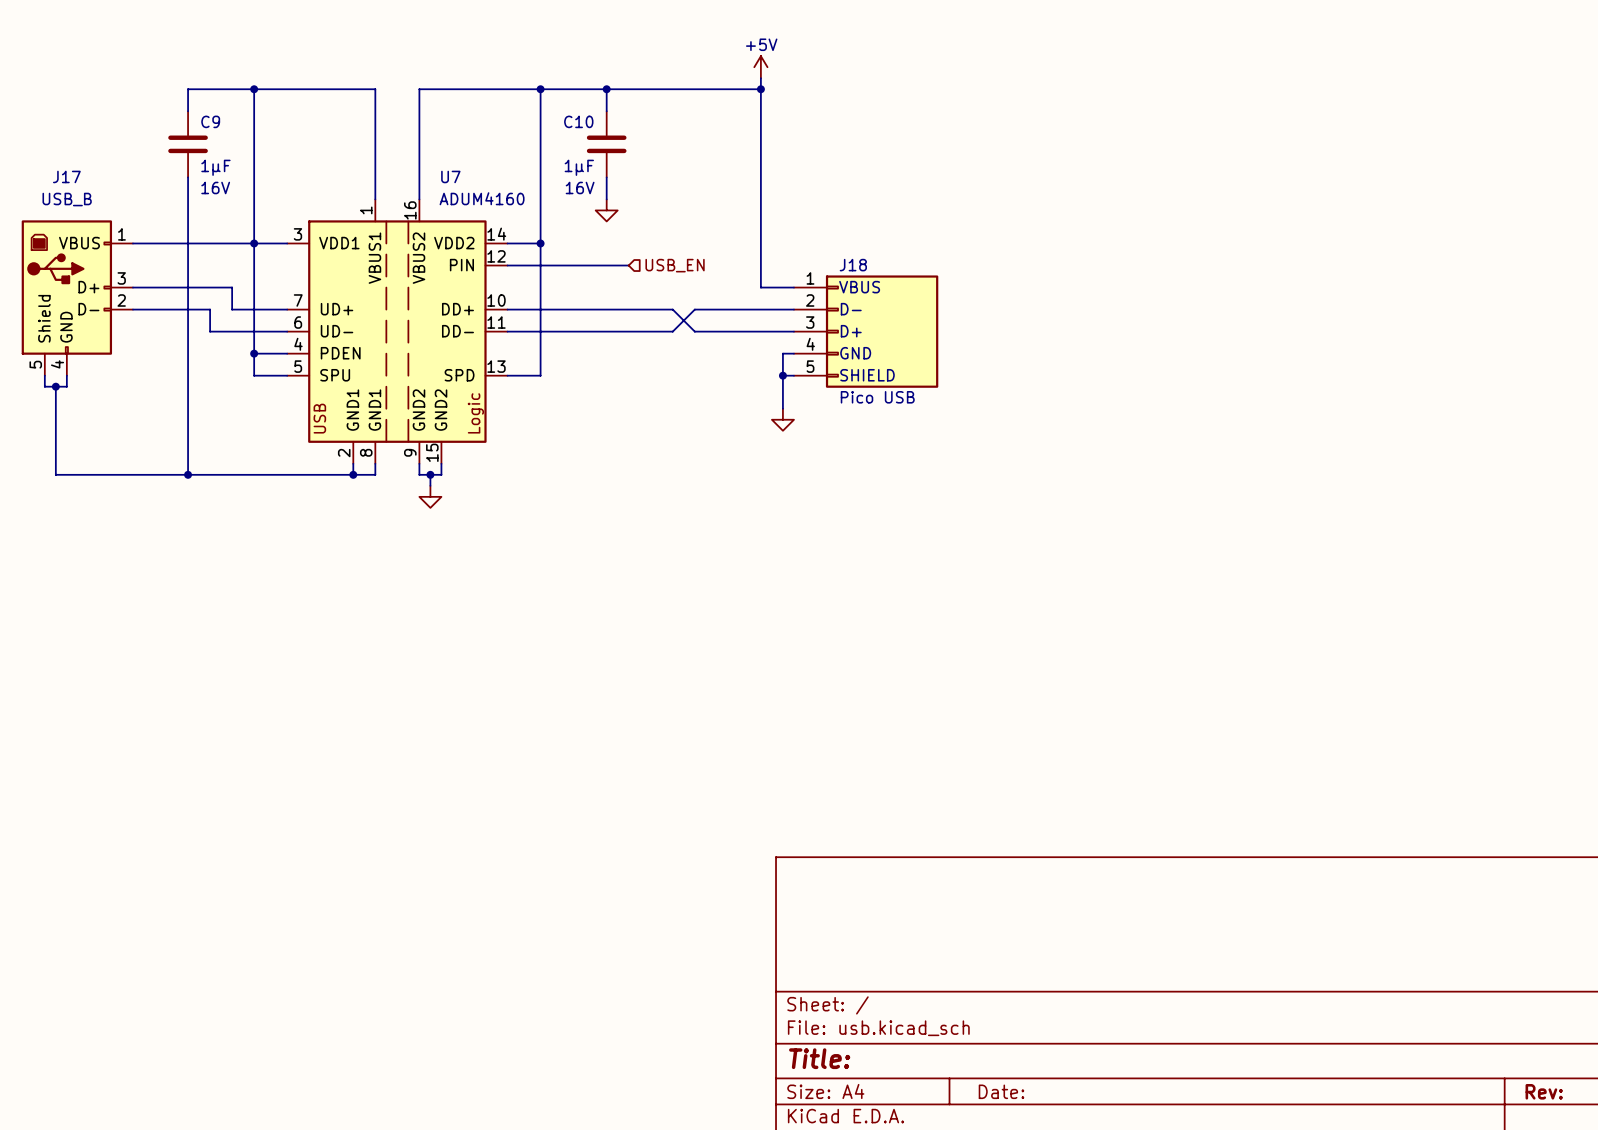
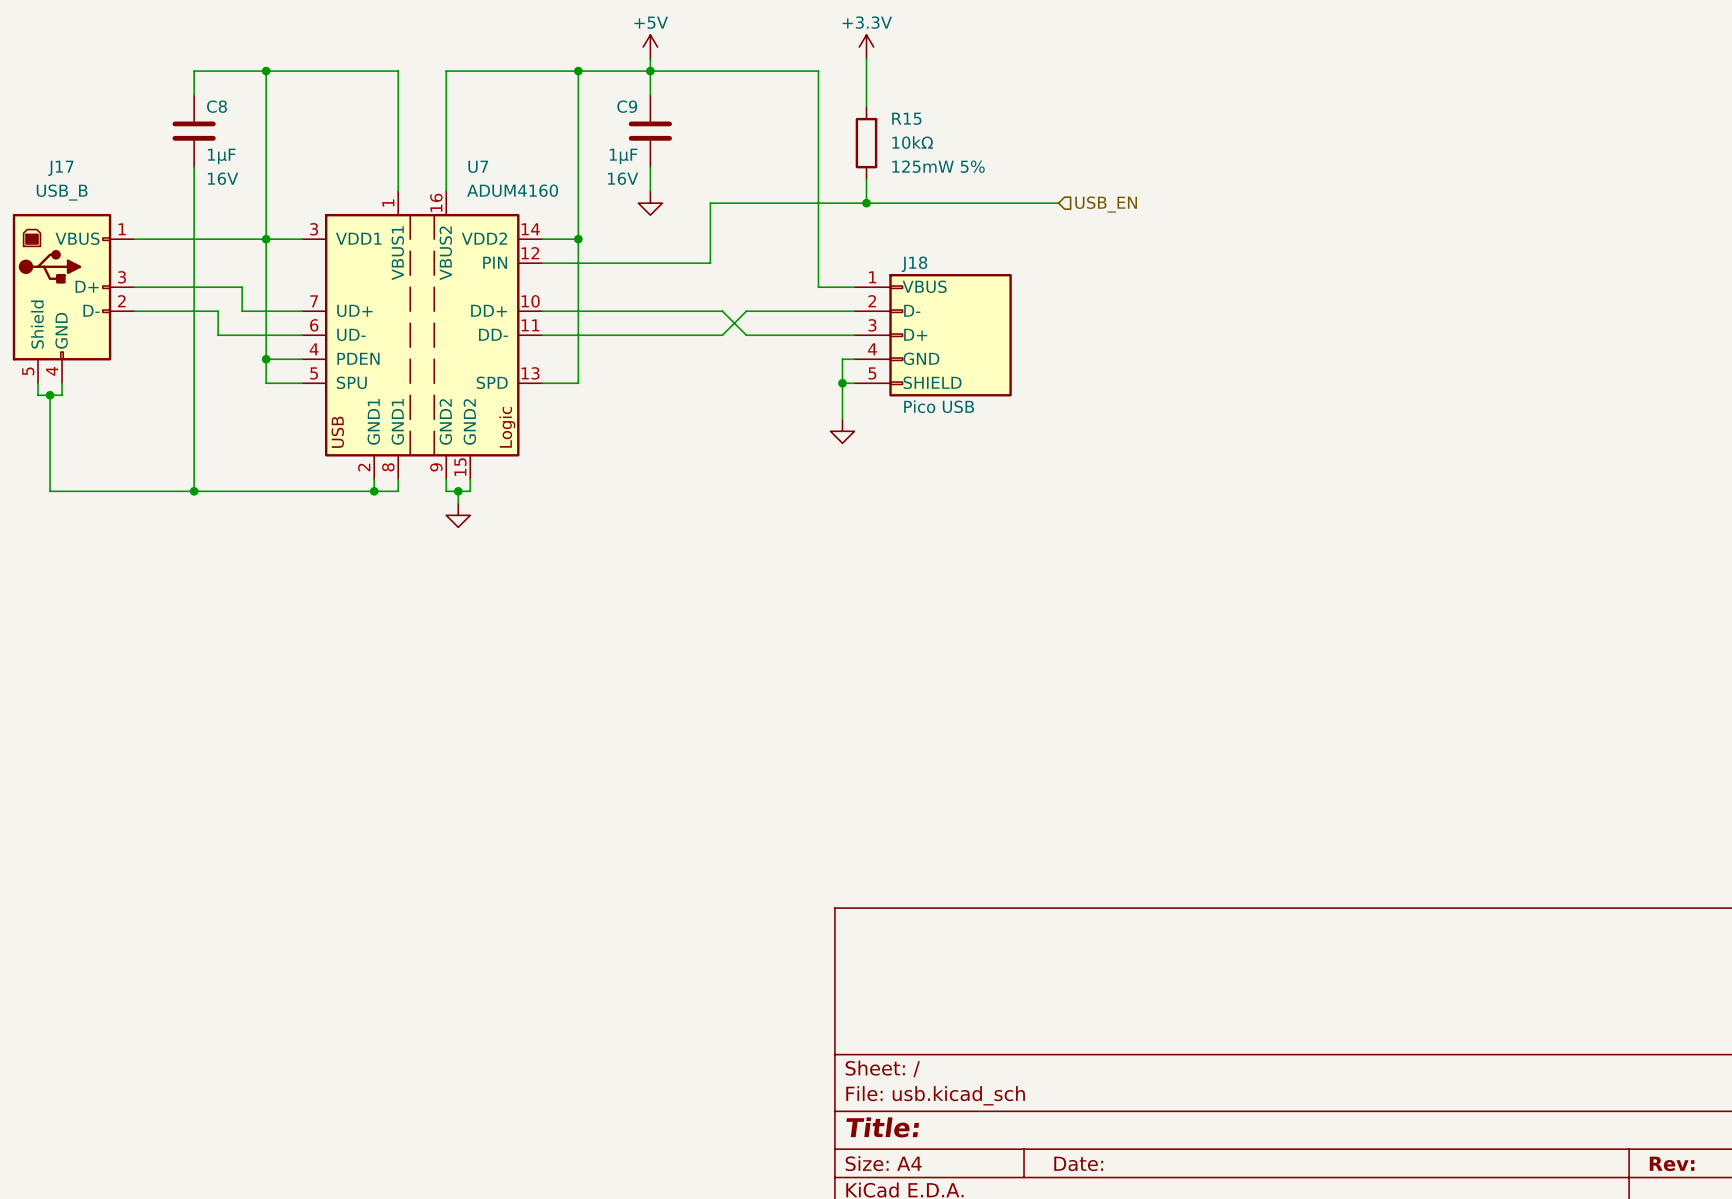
power symbol position: +5V (760, 67) -> +5V (650, 47)
power symbol: none -> +3.3V (866, 47)
wire: (760, 78) (760, 89) -> (650, 59) (650, 71)
wire: none -> (866, 59) (866, 107)
junction: (760, 89) -> none
C9 name: C9 (210, 121) -> C8 (217, 106)
C10 name: C10 (578, 121) -> C9 (627, 106)
R15: none -> 10kΩ (866, 143)
wire: none -> (866, 179) (866, 203)
junction: none -> (866, 203)
wire: none -> (1058, 203) (710, 203) (710, 263) (674, 263)
hierarchical label: none -> USB_EN (1106, 204)
hierarchical label: USB_EN (675, 265) -> none

